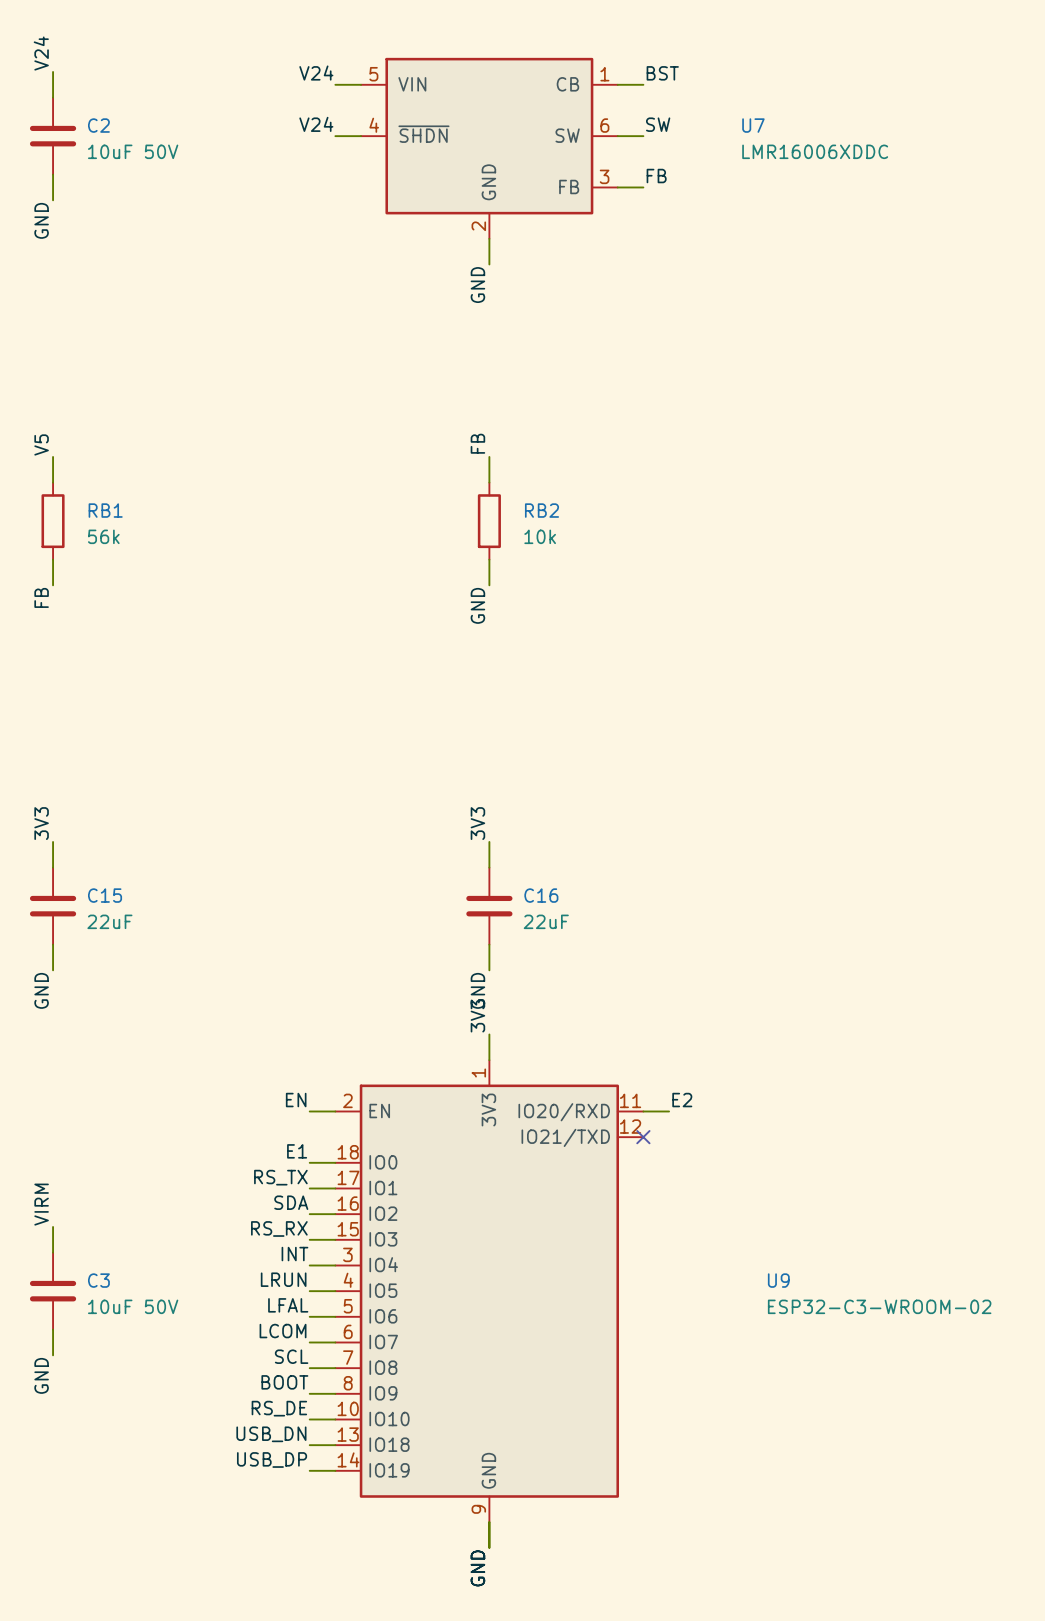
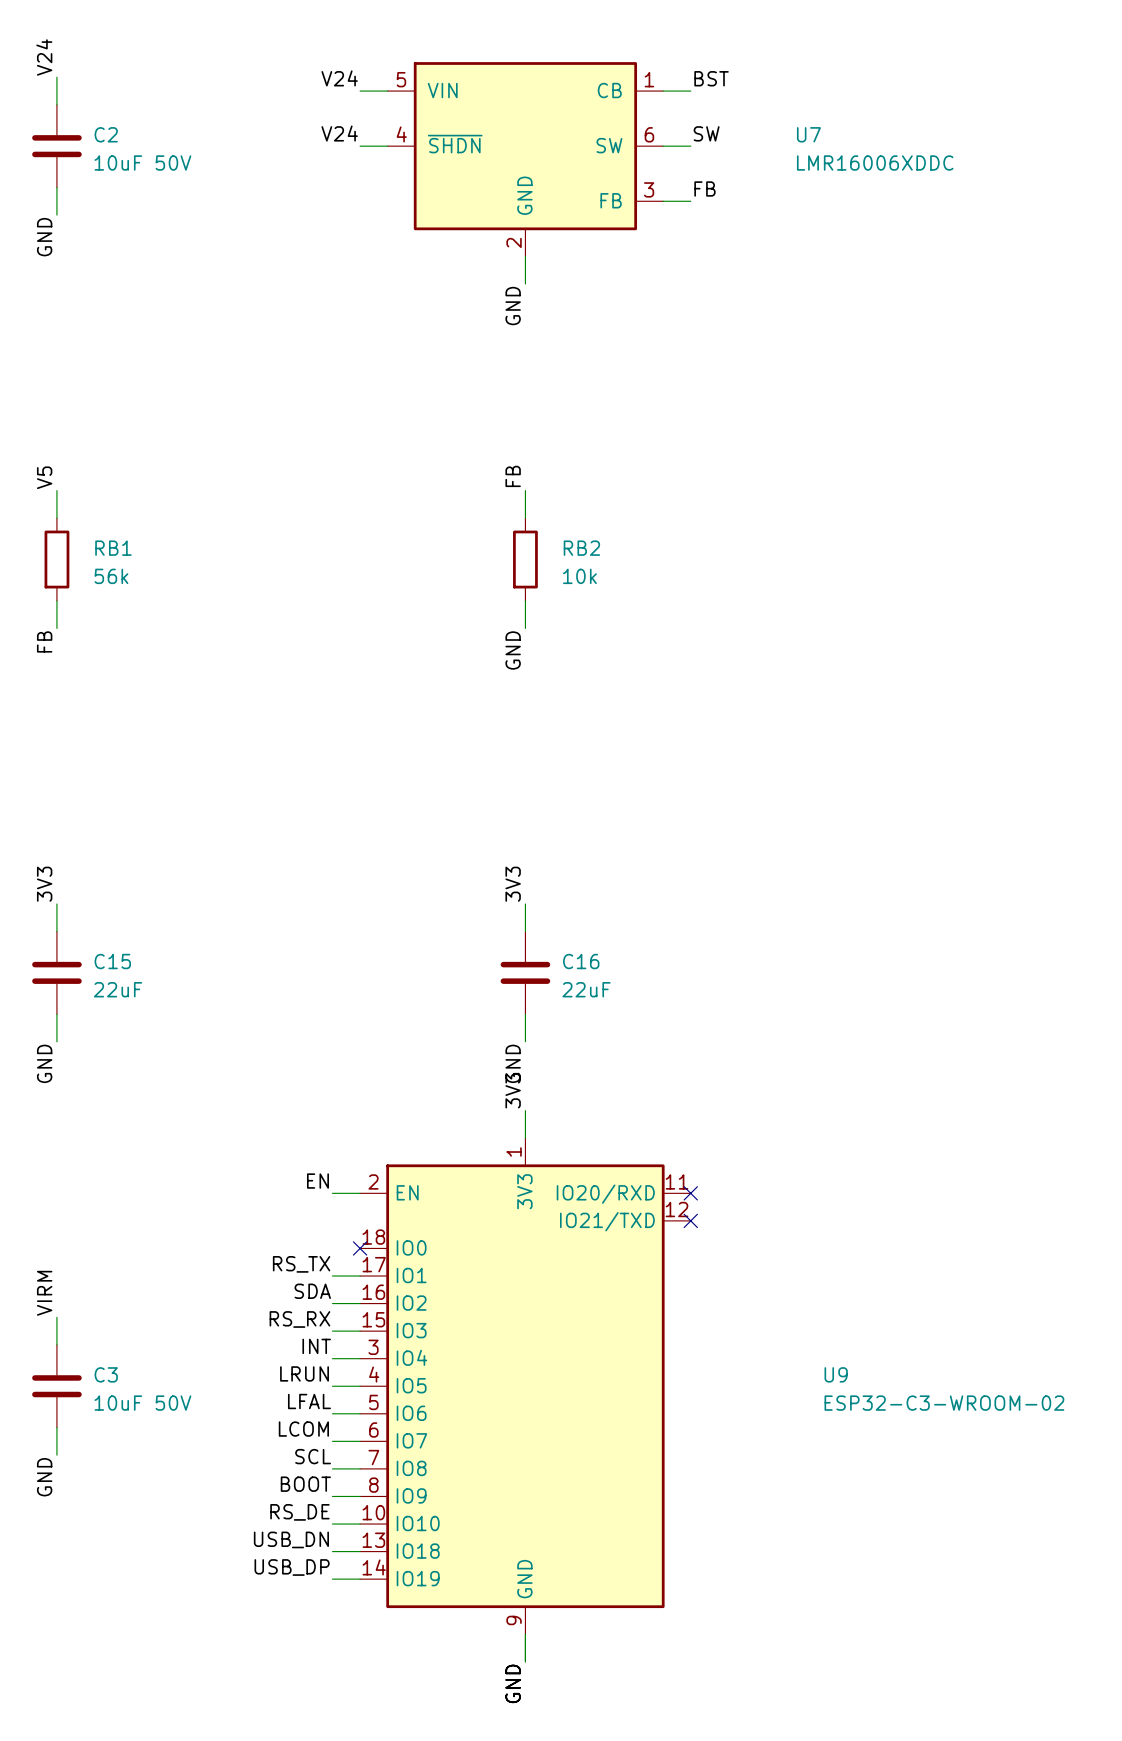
label: E2 (682, 1100) -> none
wire: (643, 1111) (669, 1111) -> none
no-connect mark: none -> (690, 1193)
label: E1 (297, 1151) -> none
wire: (309, 1162) (335, 1162) -> none
no-connect mark: none -> (360, 1248)

